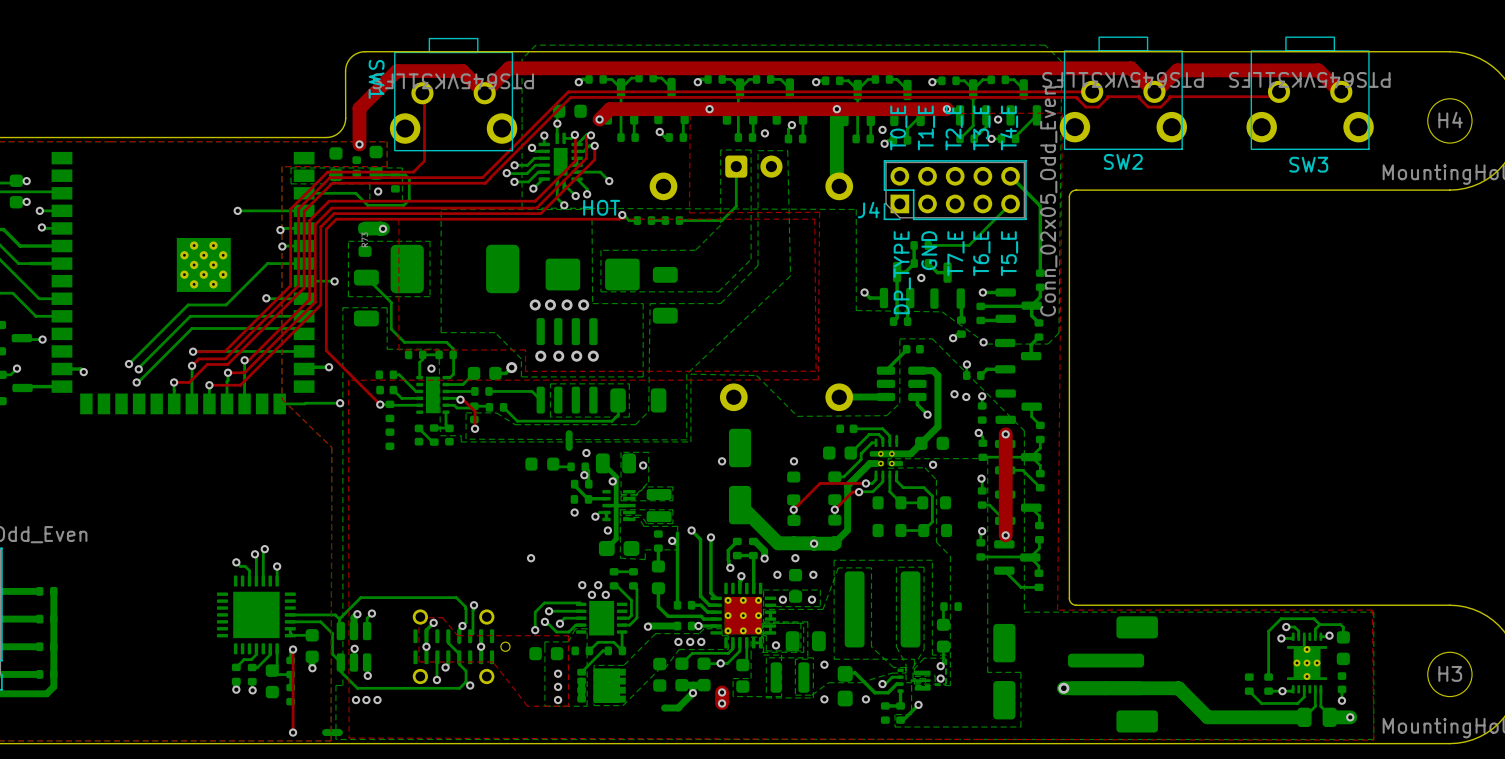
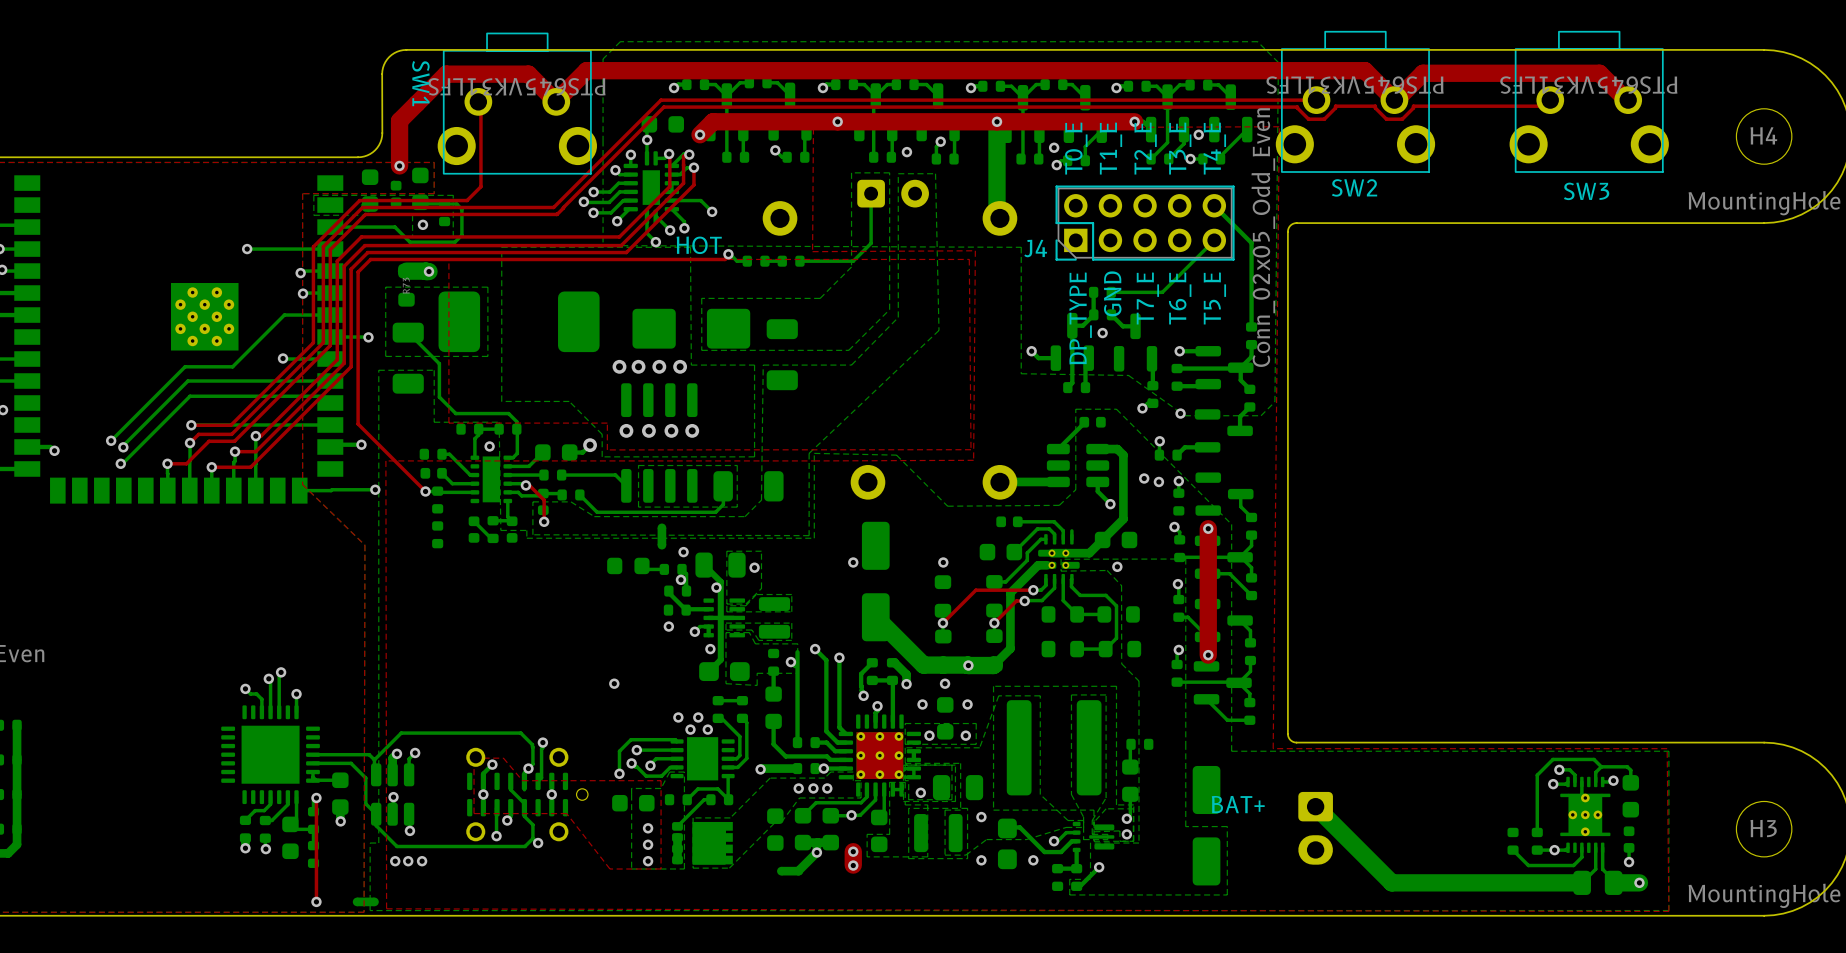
text: none -> BAT+ (1238, 804)
part: none -> (1315, 828)
part: (1112, 674) -> none
bottom track: (1063, 688) (1178, 688) (1207, 717) -> (1315, 806) (1391, 882) (1461, 882)
via: (1063, 688) -> none

